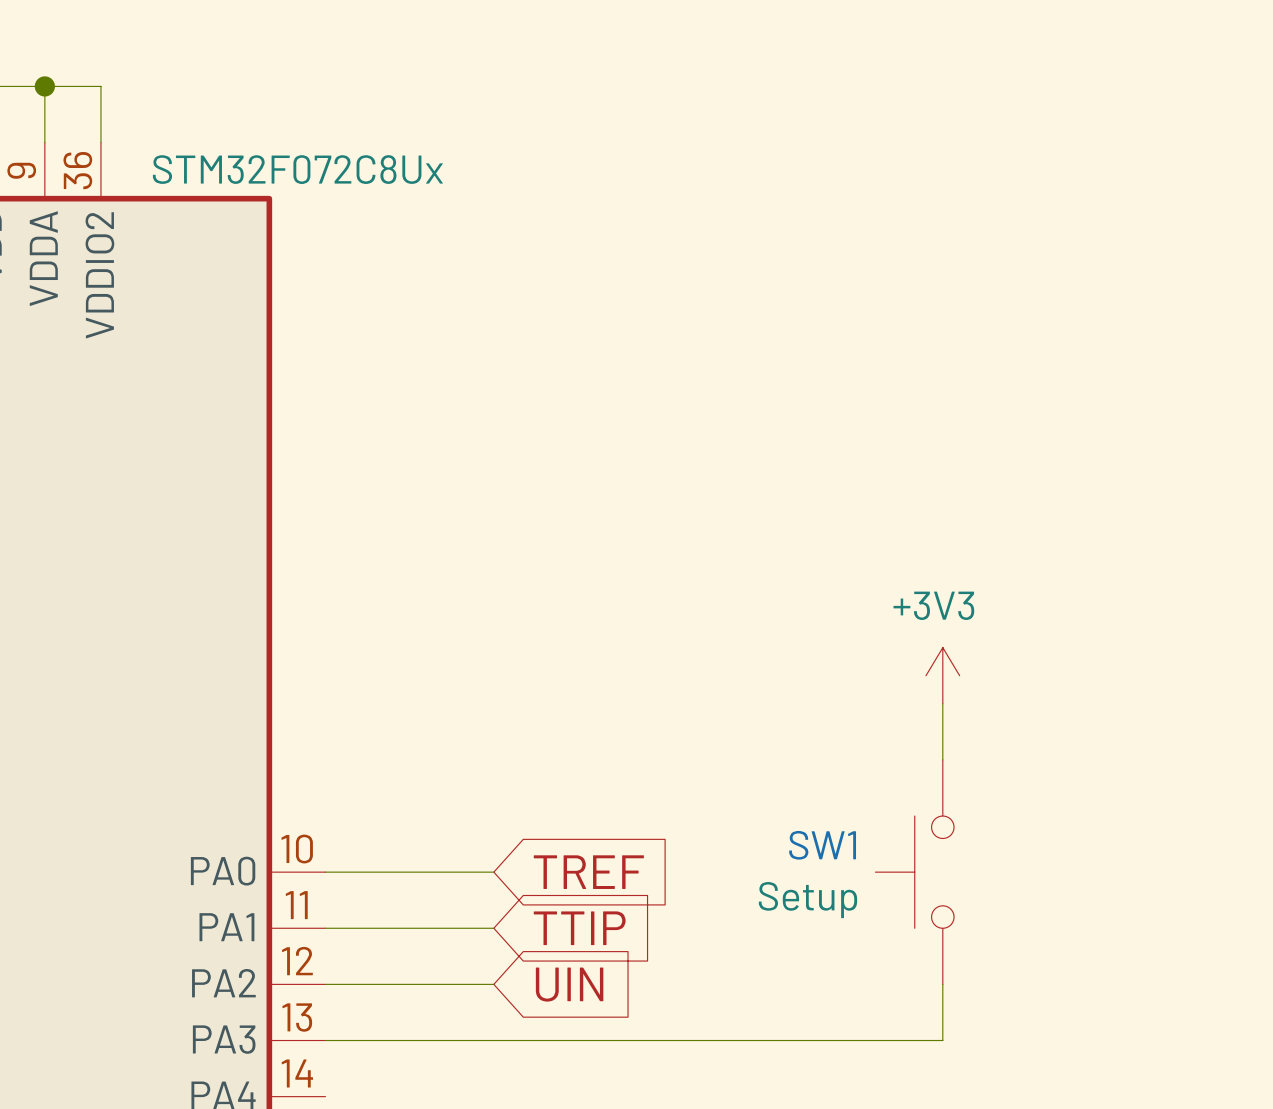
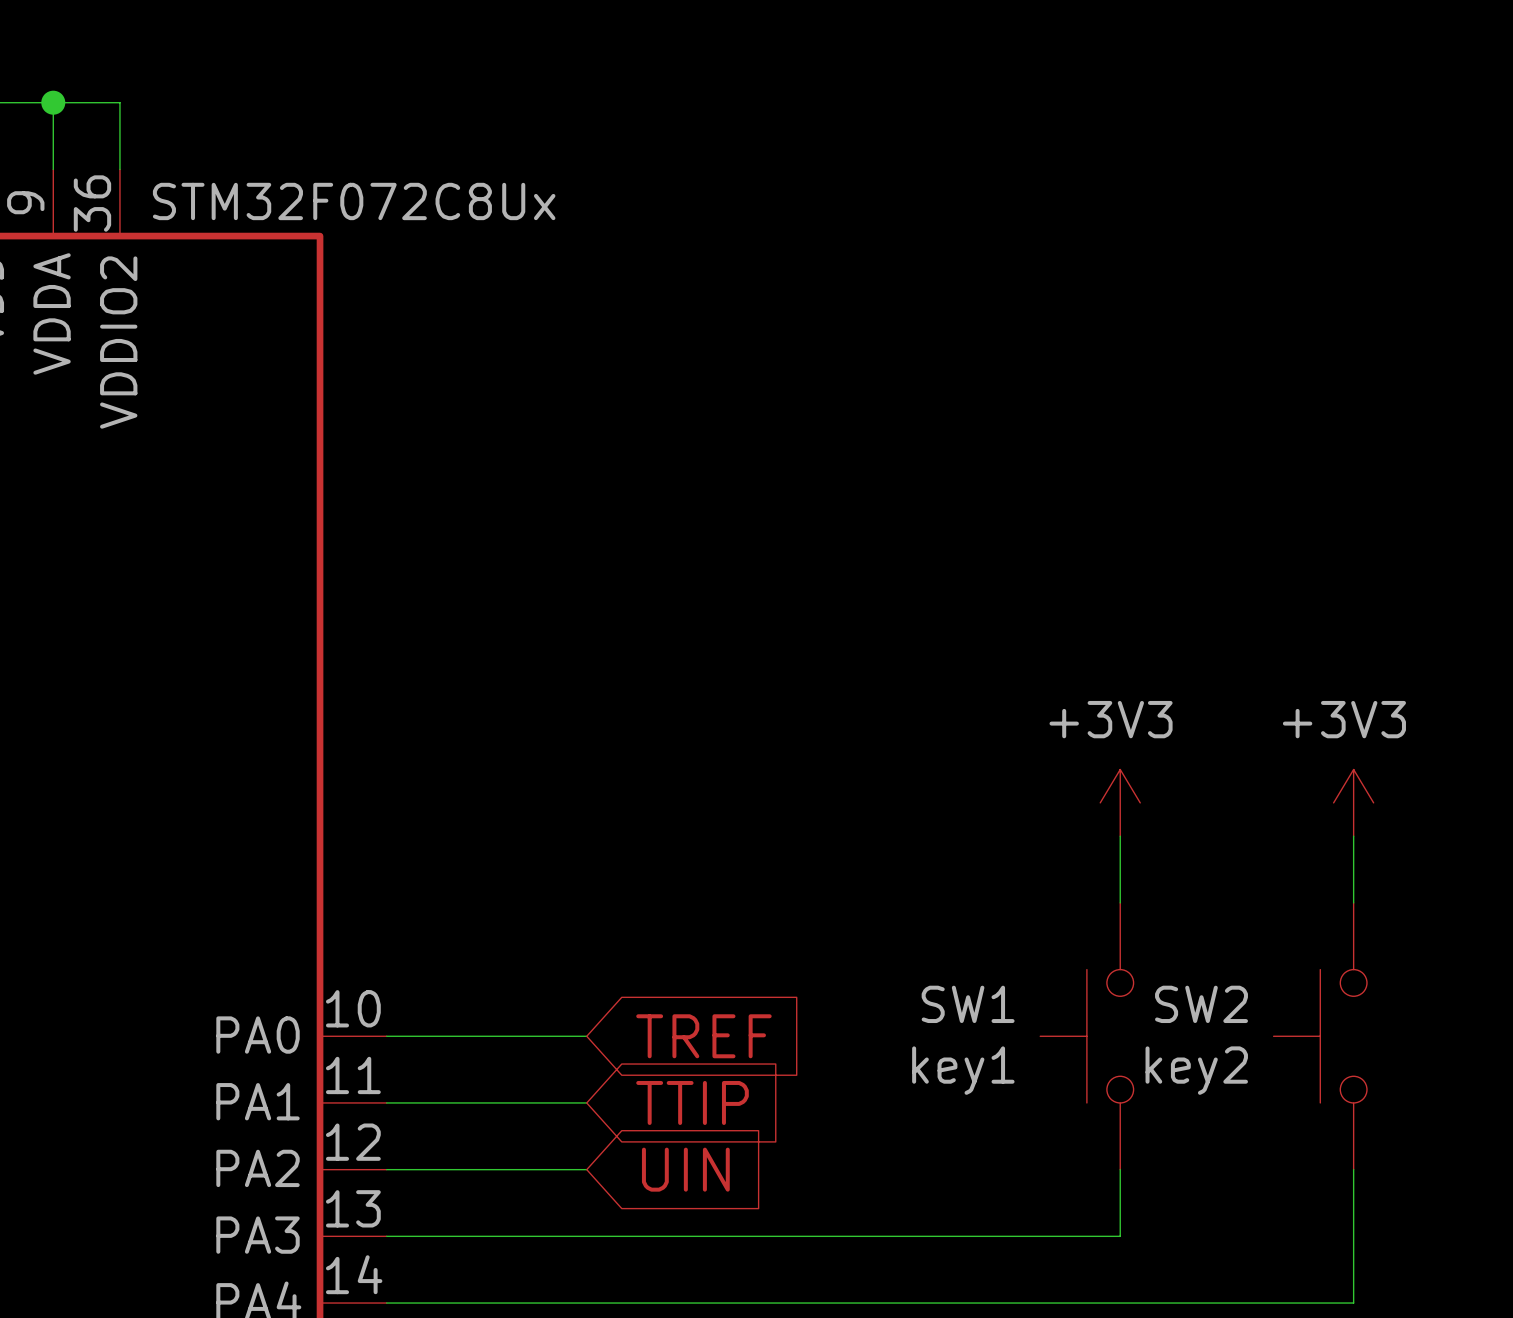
power symbol: none -> +3V3 (1353, 802)
wire: none -> (1353, 836) (1353, 902)
SW2: none -> key2 (1320, 1036)
SW1 value: Setup (808, 900) -> key1 (963, 1070)
wire: none -> (1353, 1169) (1353, 1303) (386, 1303)

